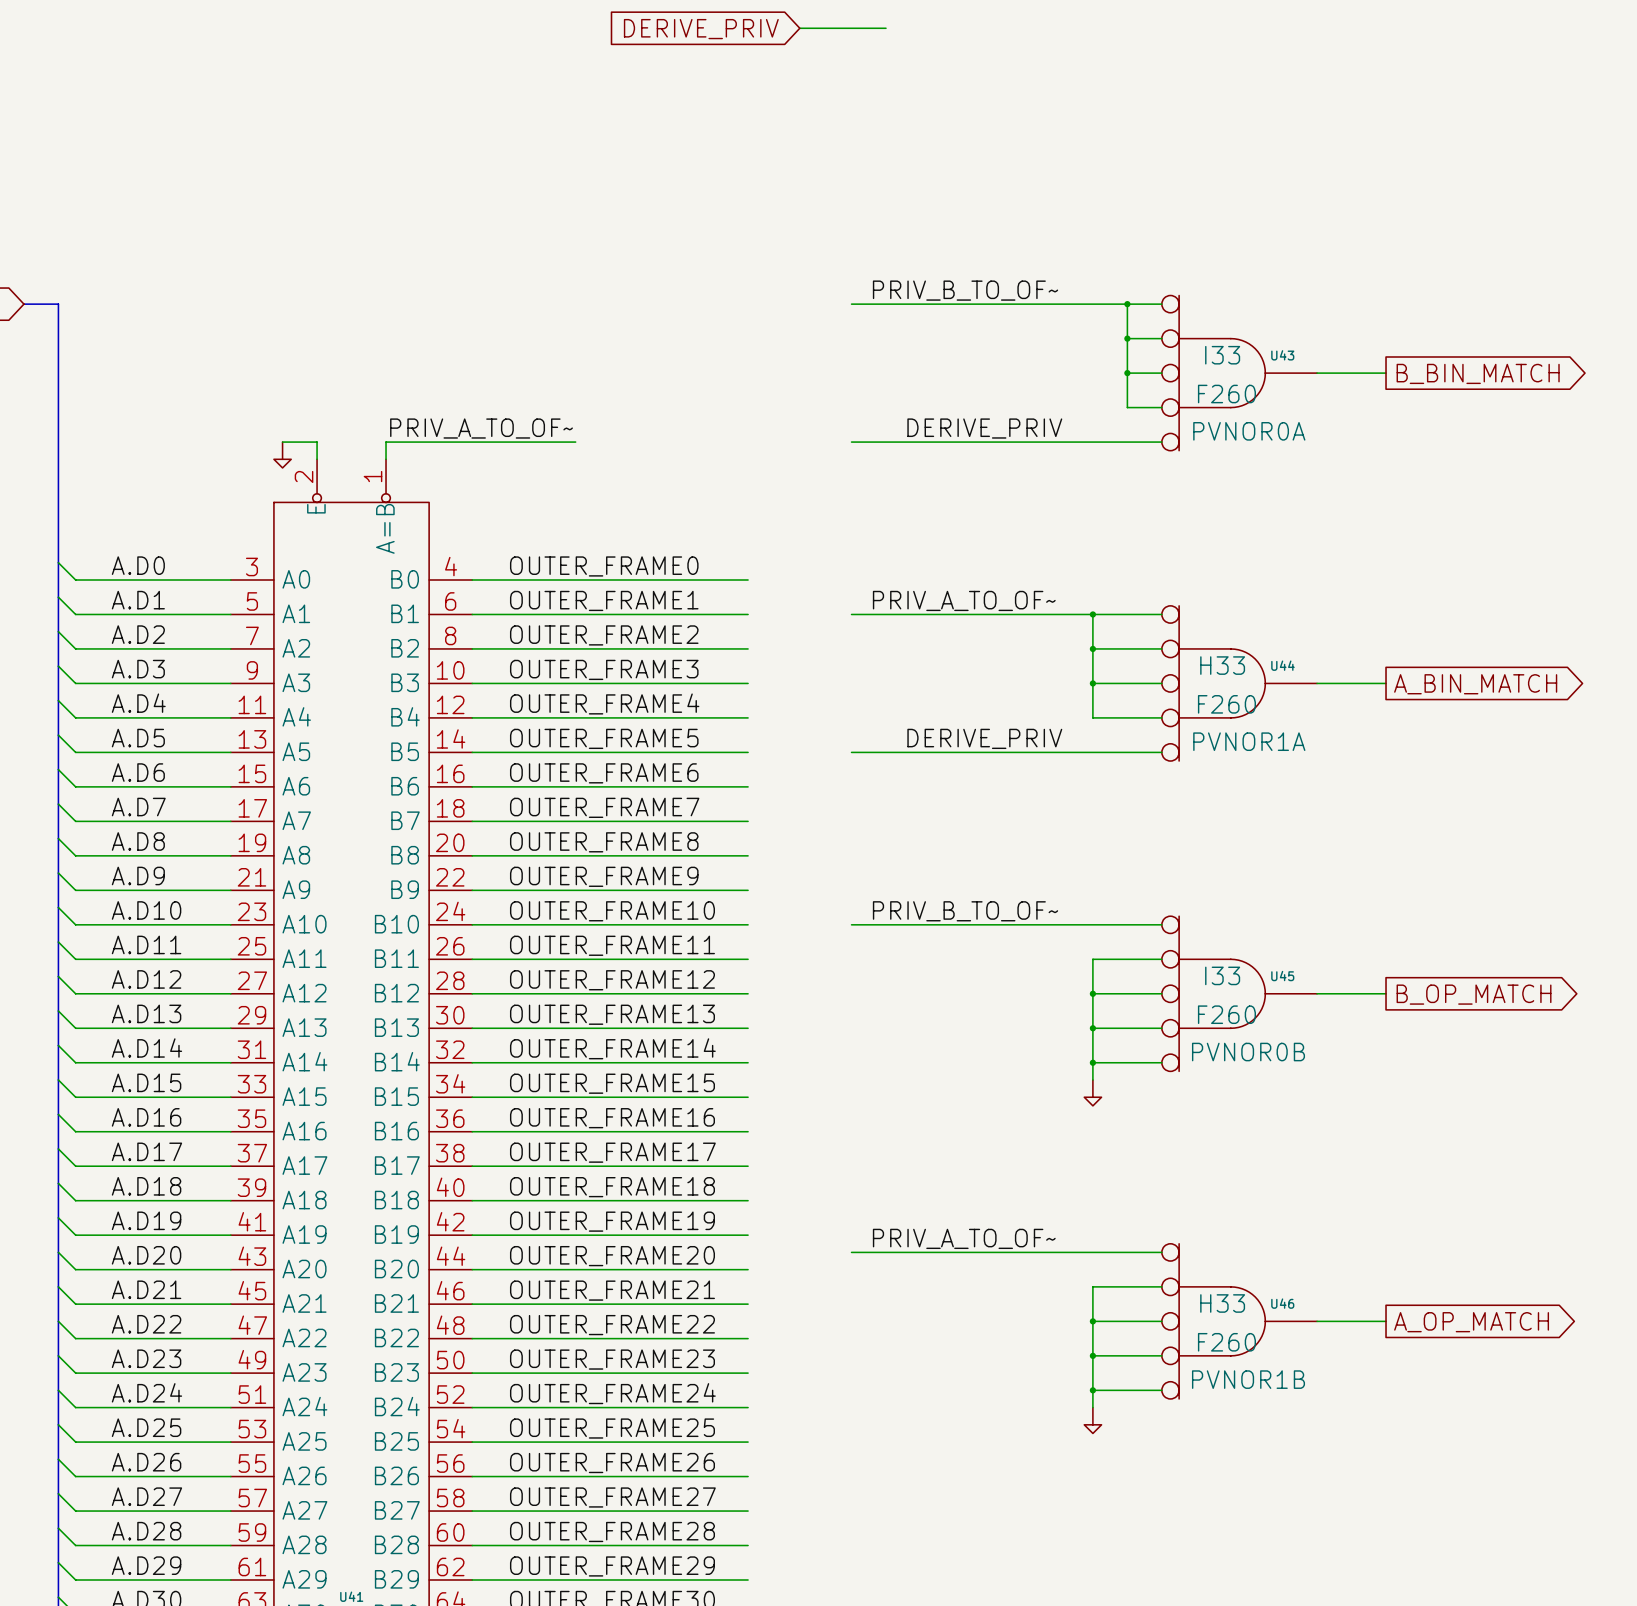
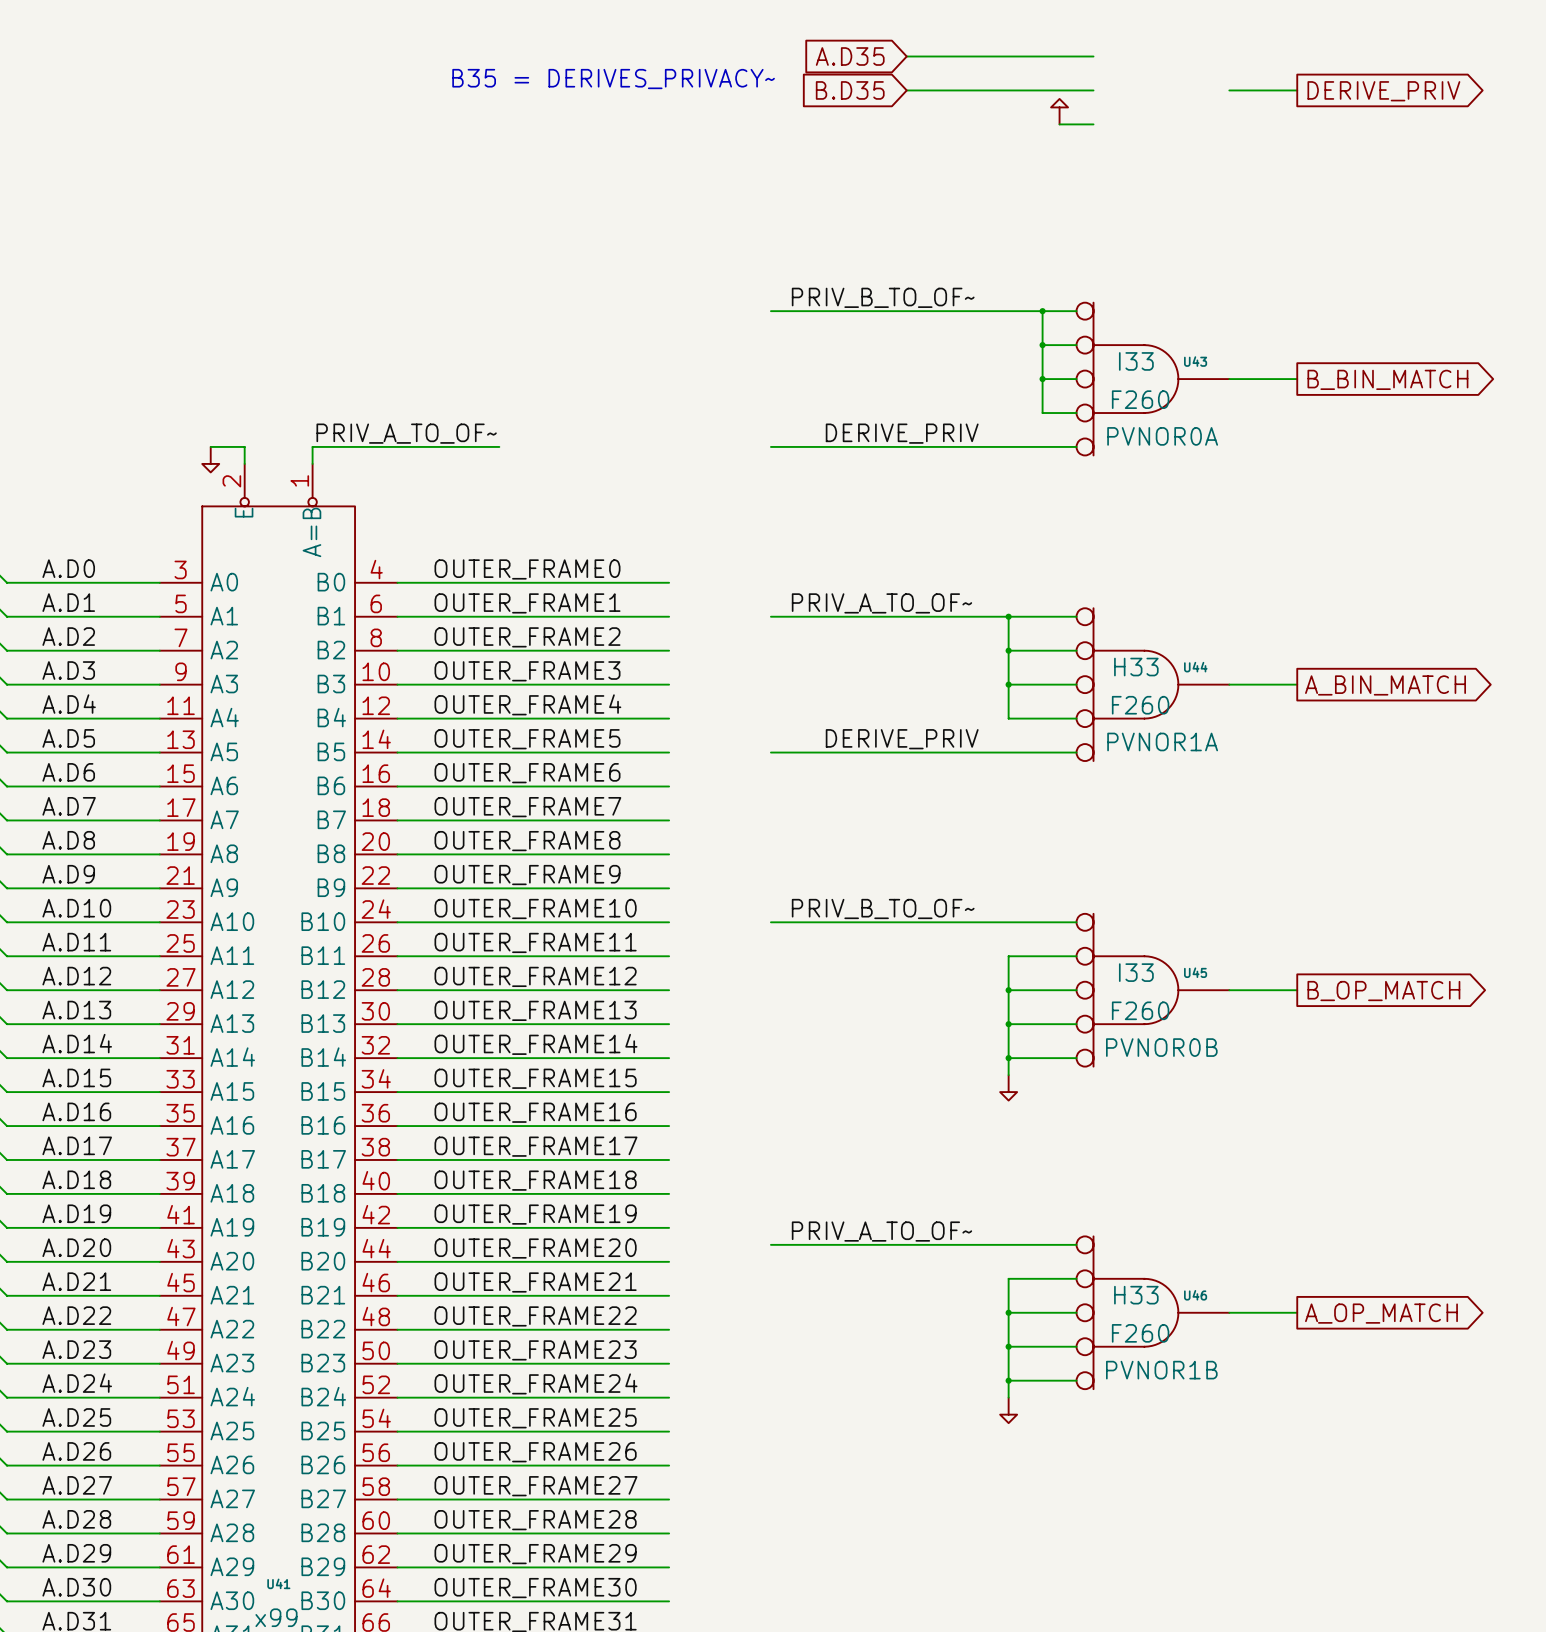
wire: (799, 28) (886, 28) -> none
global label: DERIVE_PRIV (701, 29) -> none
global label: none -> A.D35 (850, 56)
wire: none -> (906, 56) (1093, 56)
text: none -> B35 = DERIVES_PRIVACY~ (613, 79)
global label: none -> B.D35 (850, 90)
wire: none -> (906, 90) (1093, 90)
wire: none -> (1229, 90) (1297, 90)
global label: none -> DERIVE_PRIV (1383, 91)
power symbol: none -> (1059, 111)
wire: none -> (1059, 124) (1093, 124)

